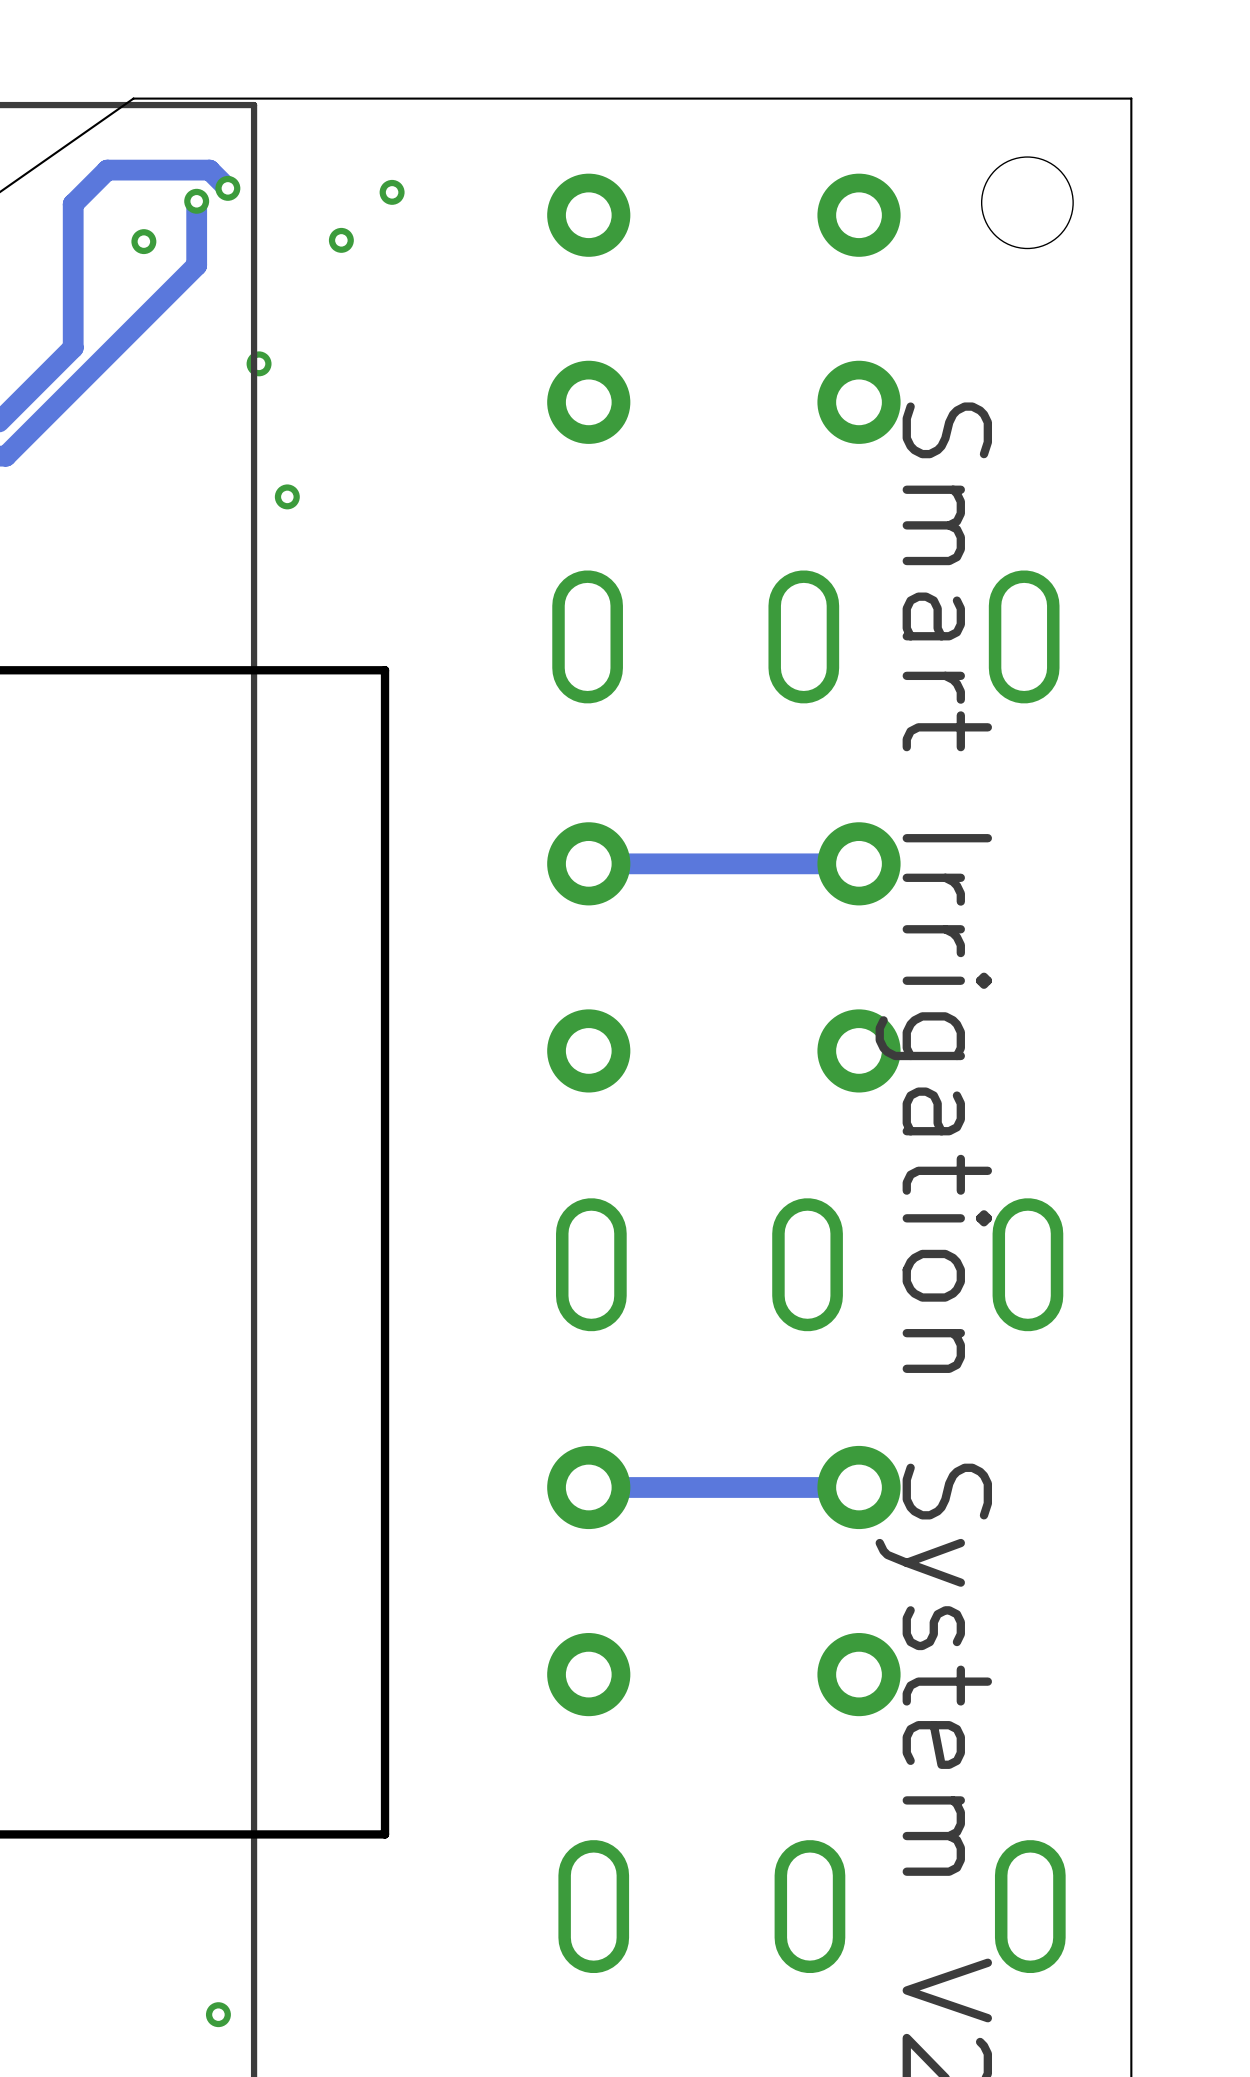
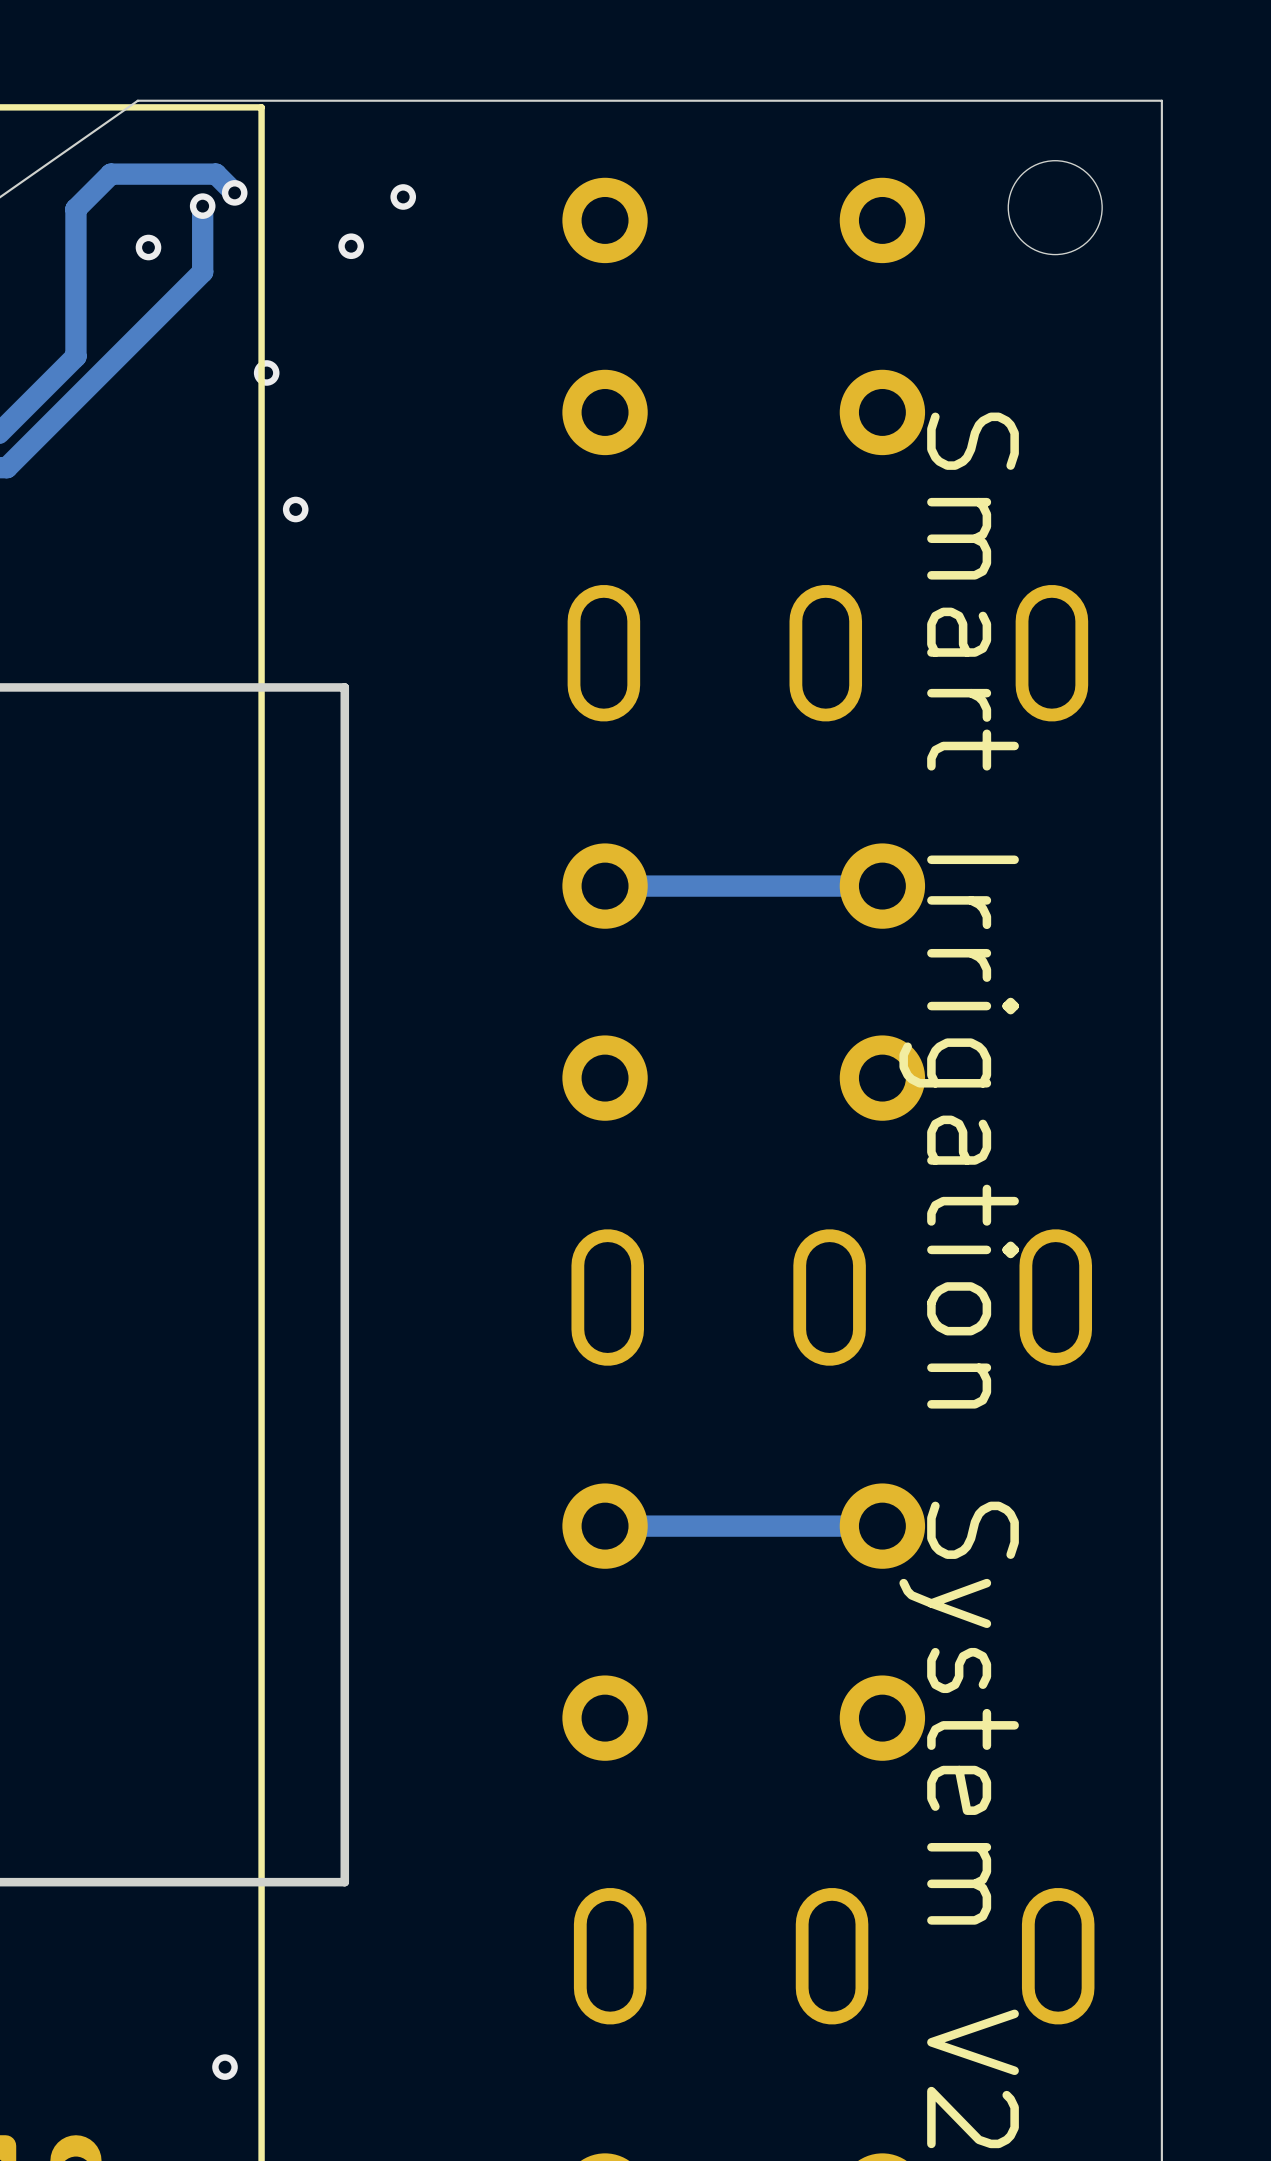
board edge: (335, 670) (385, 670) (385, 1834) (335, 1834) -> (344, 687) (344, 1882)

